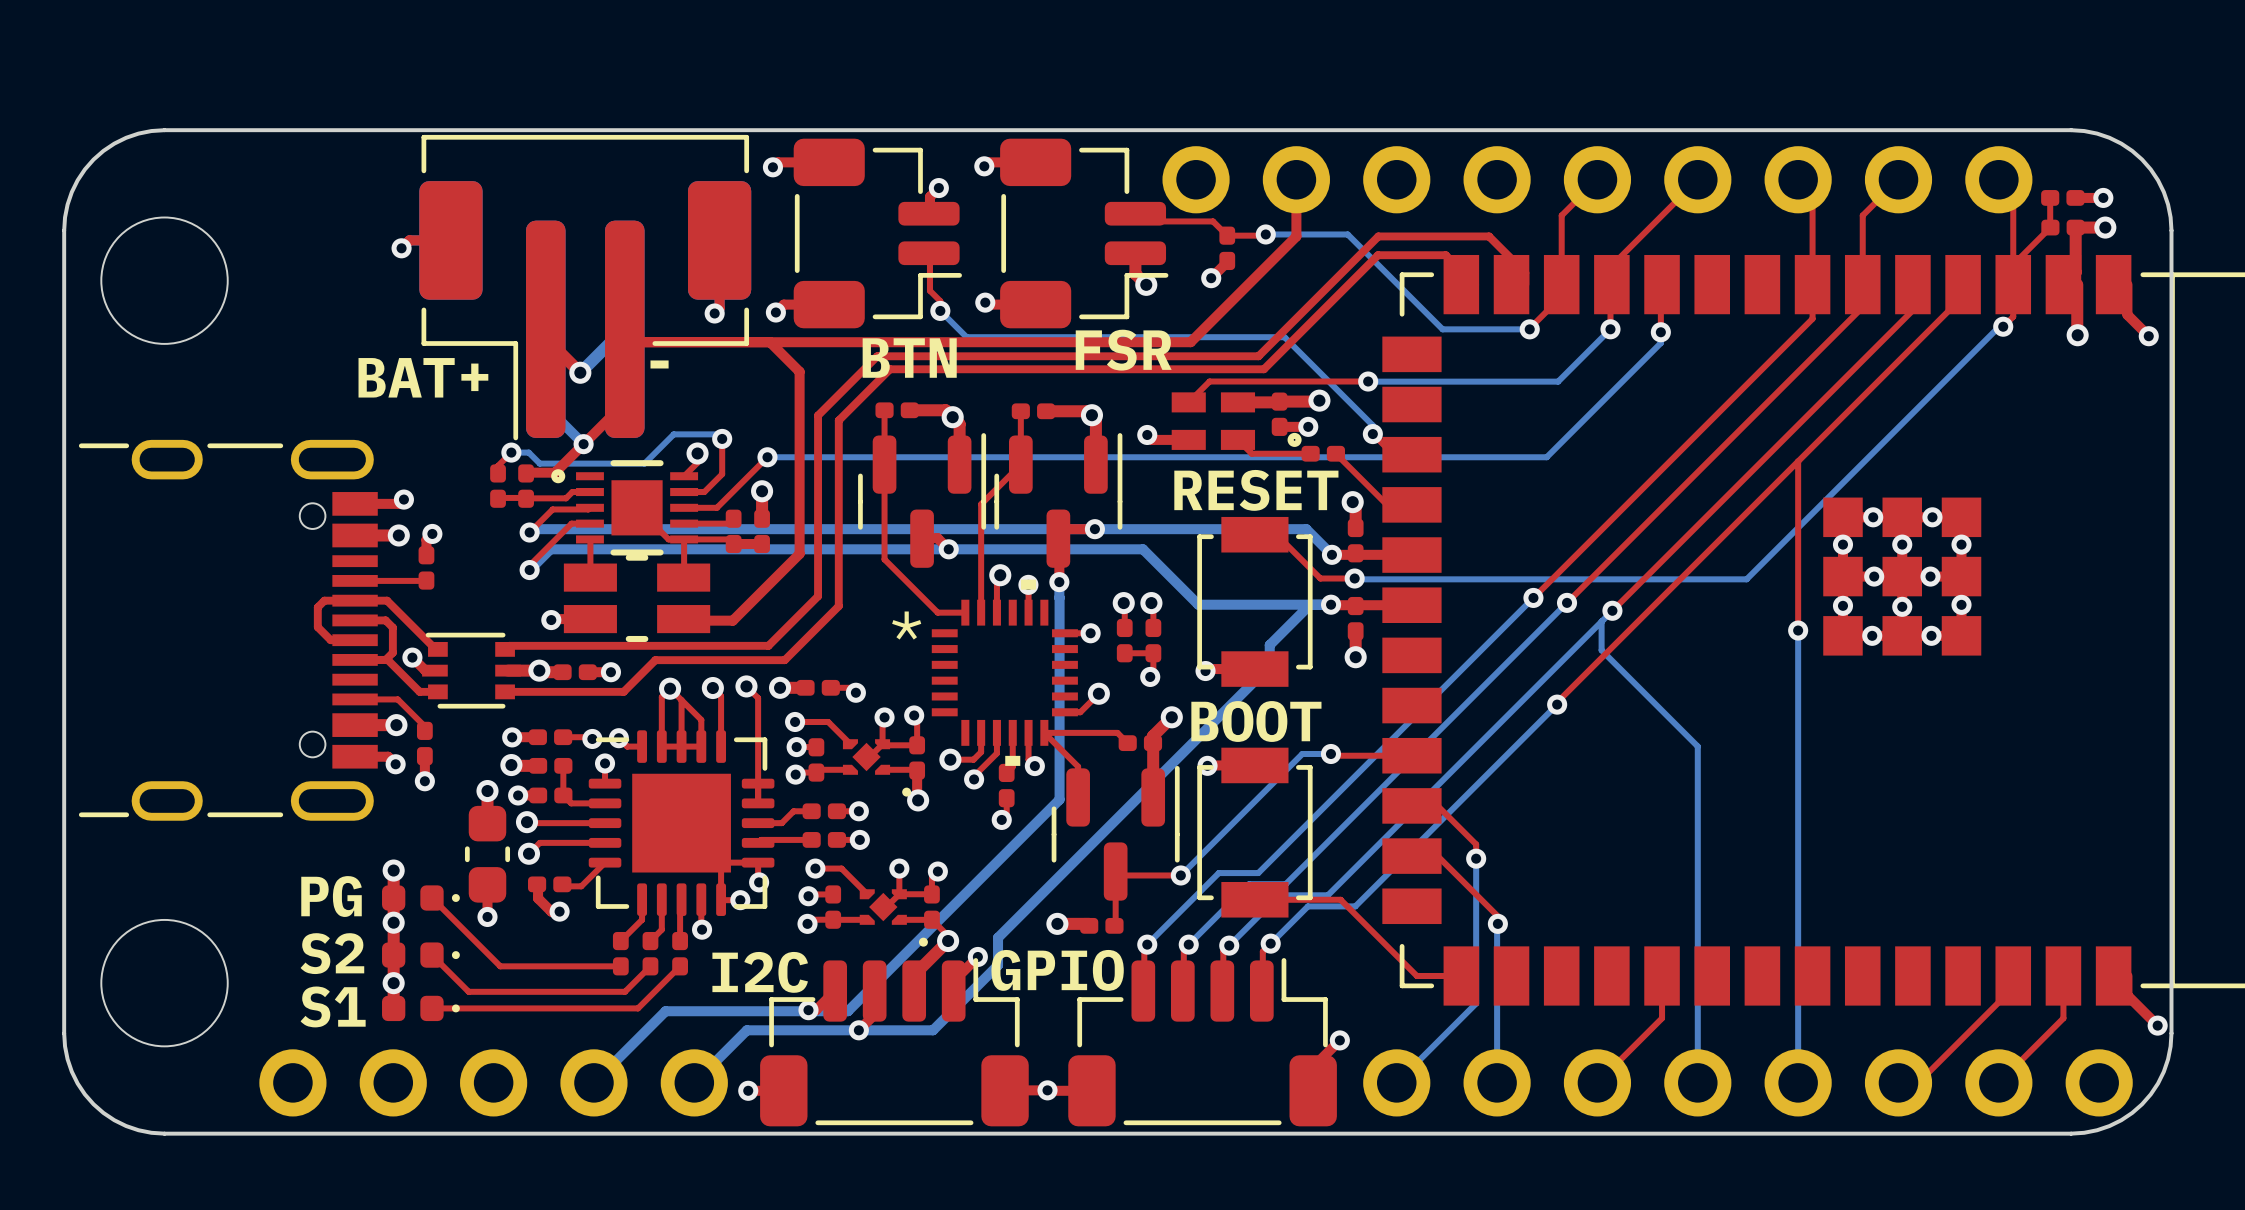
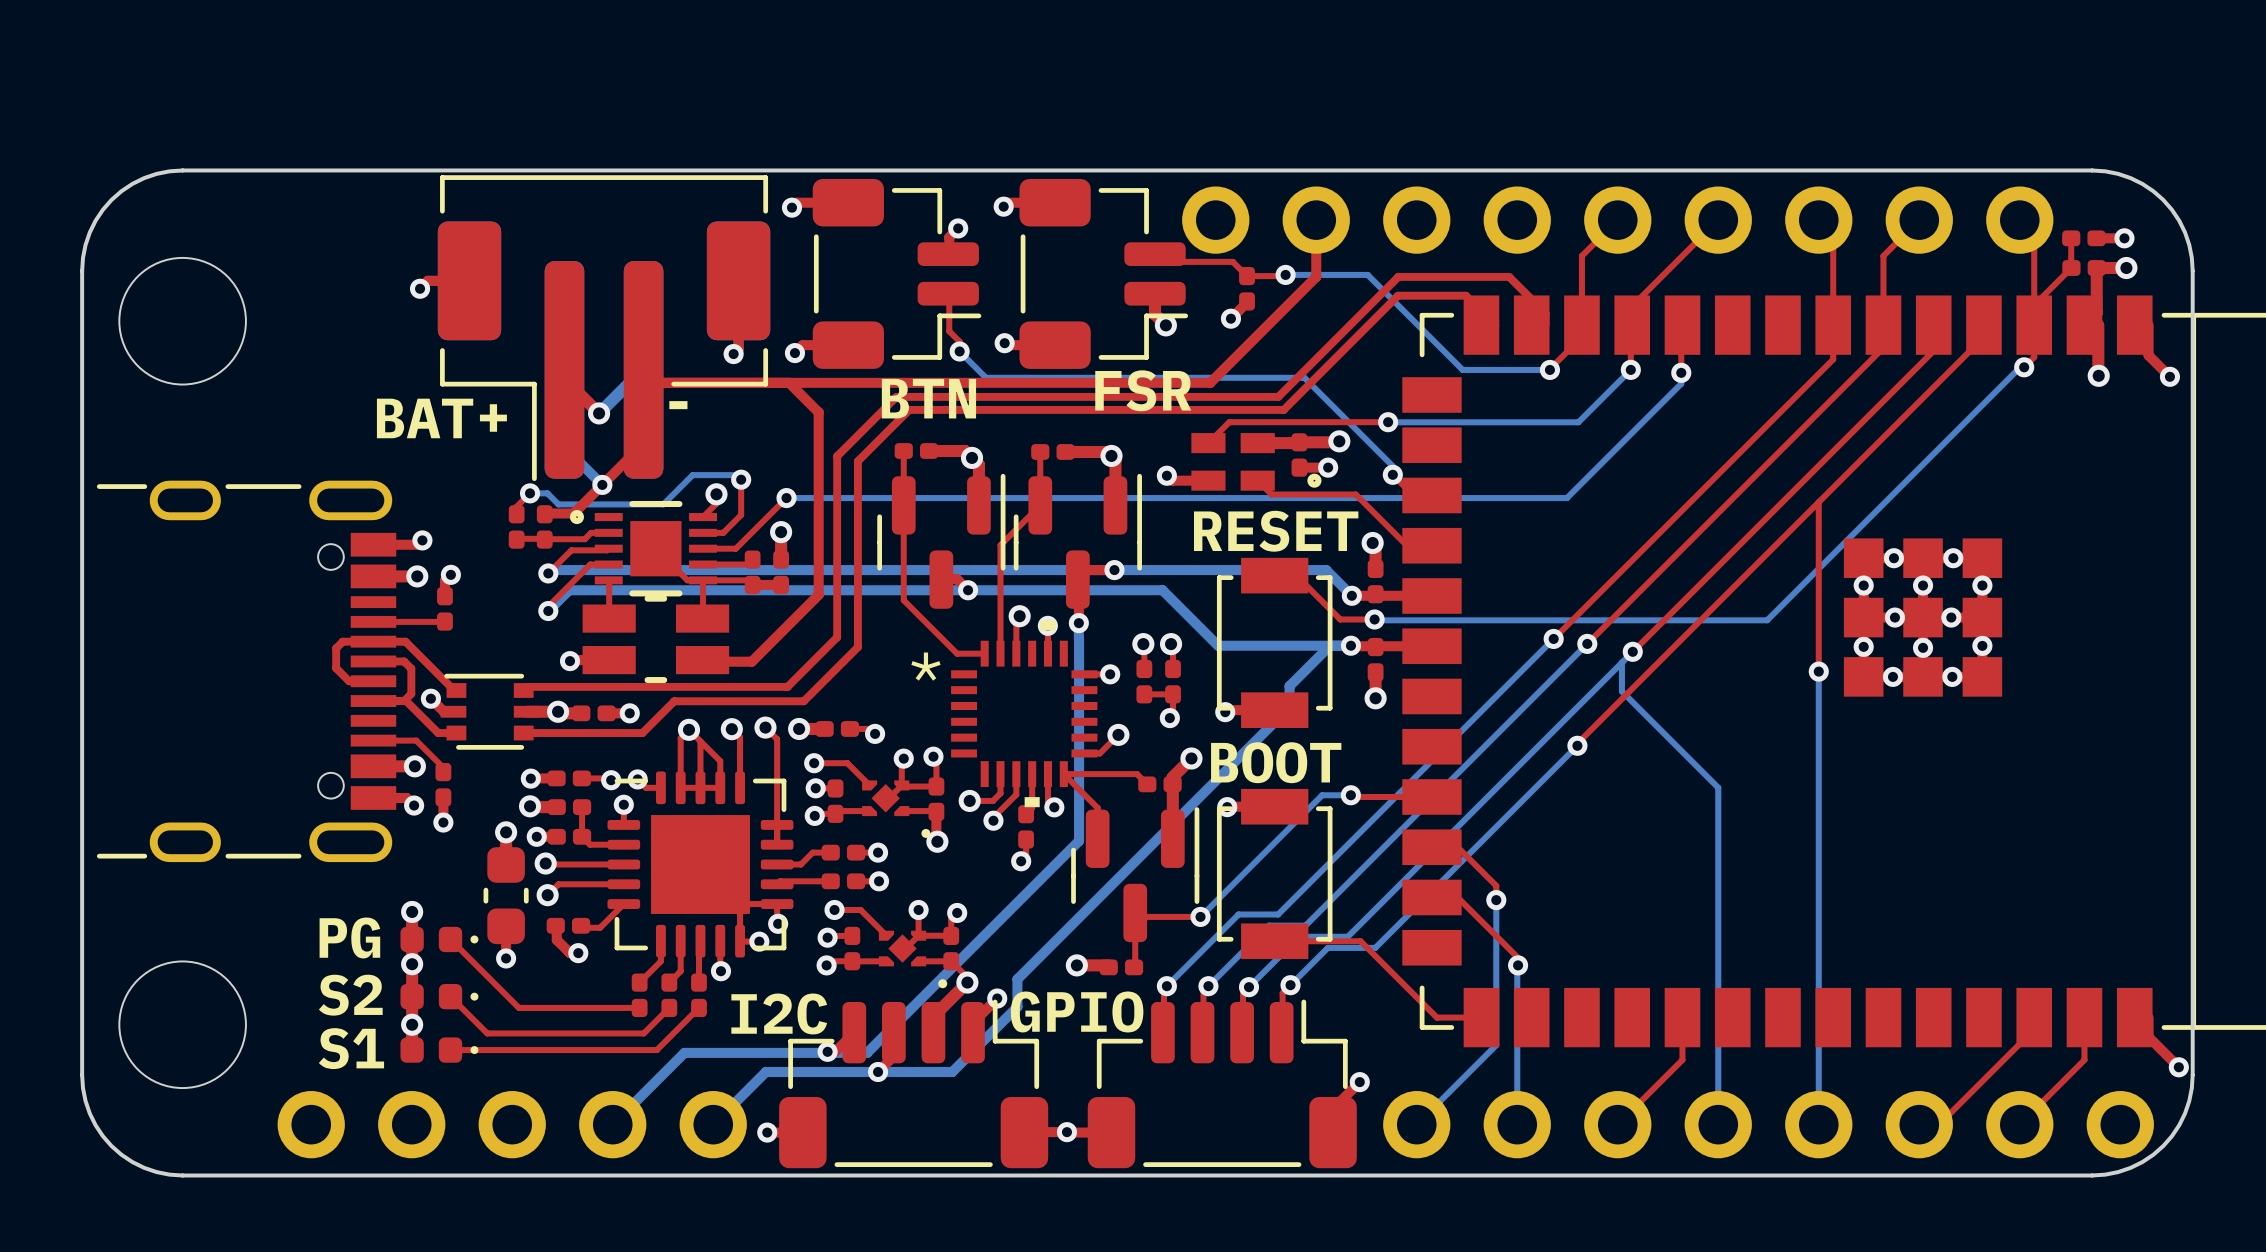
top track: none -> (1330, 494) (1355, 494)
part: (1323, 453) -> none

